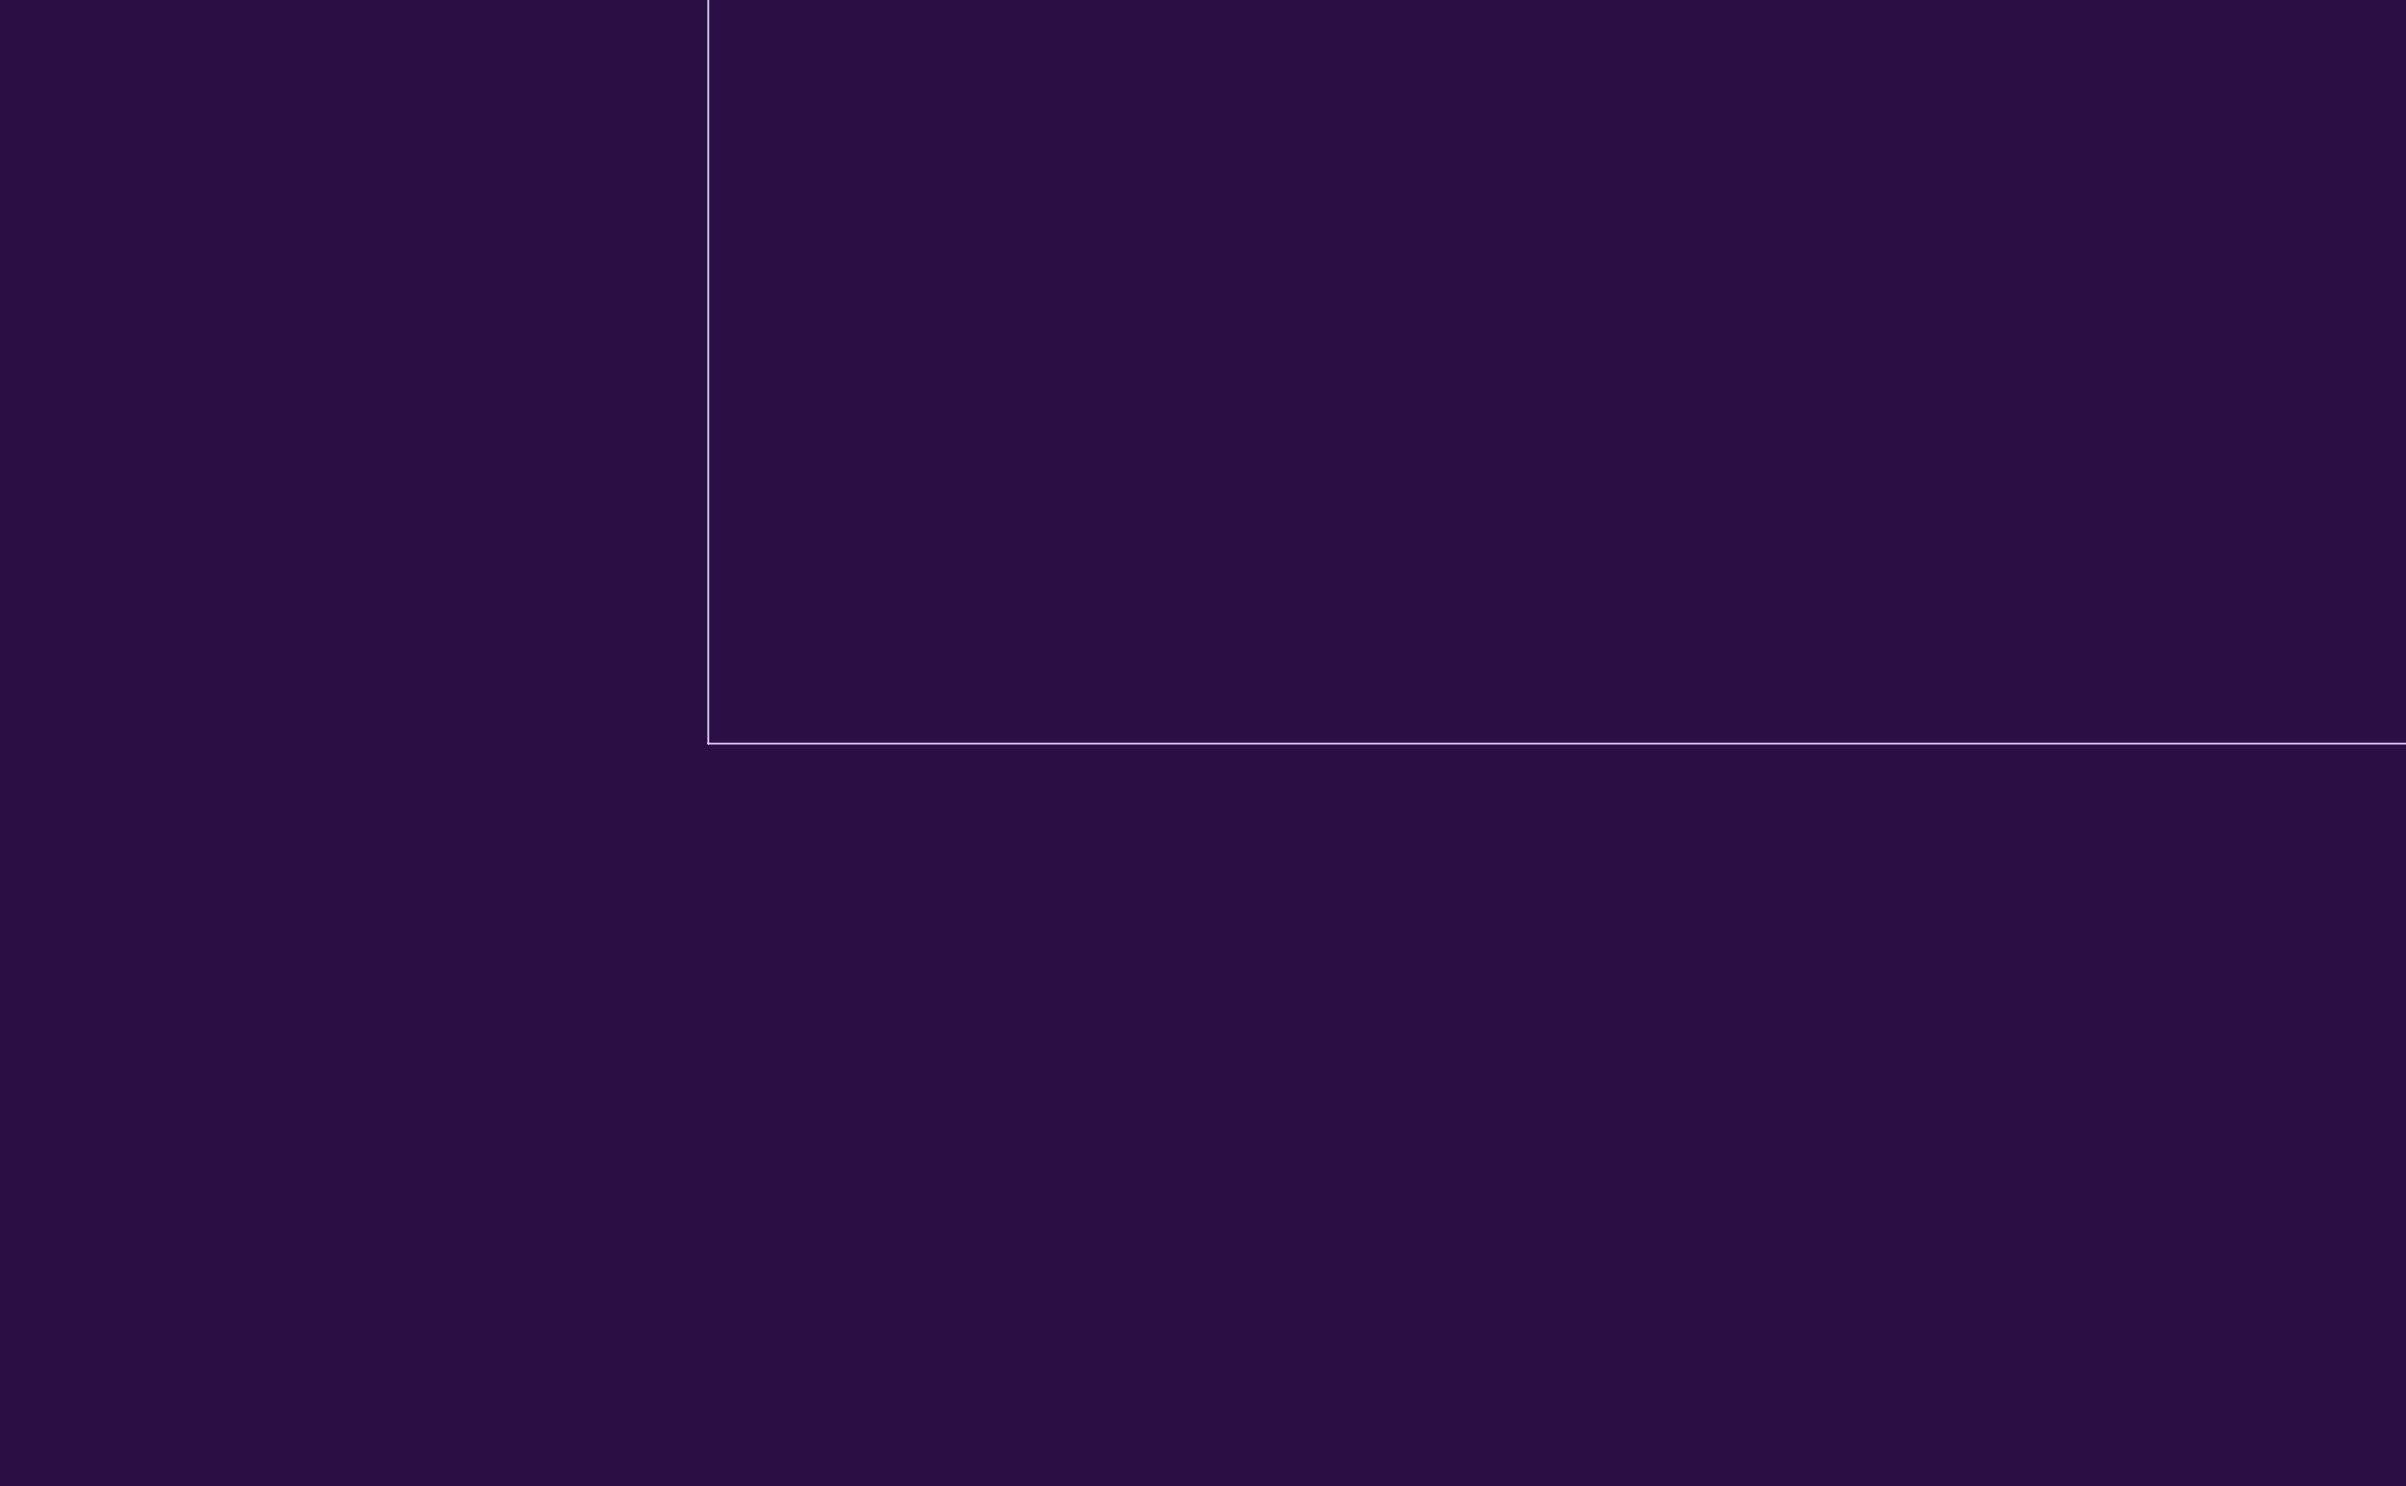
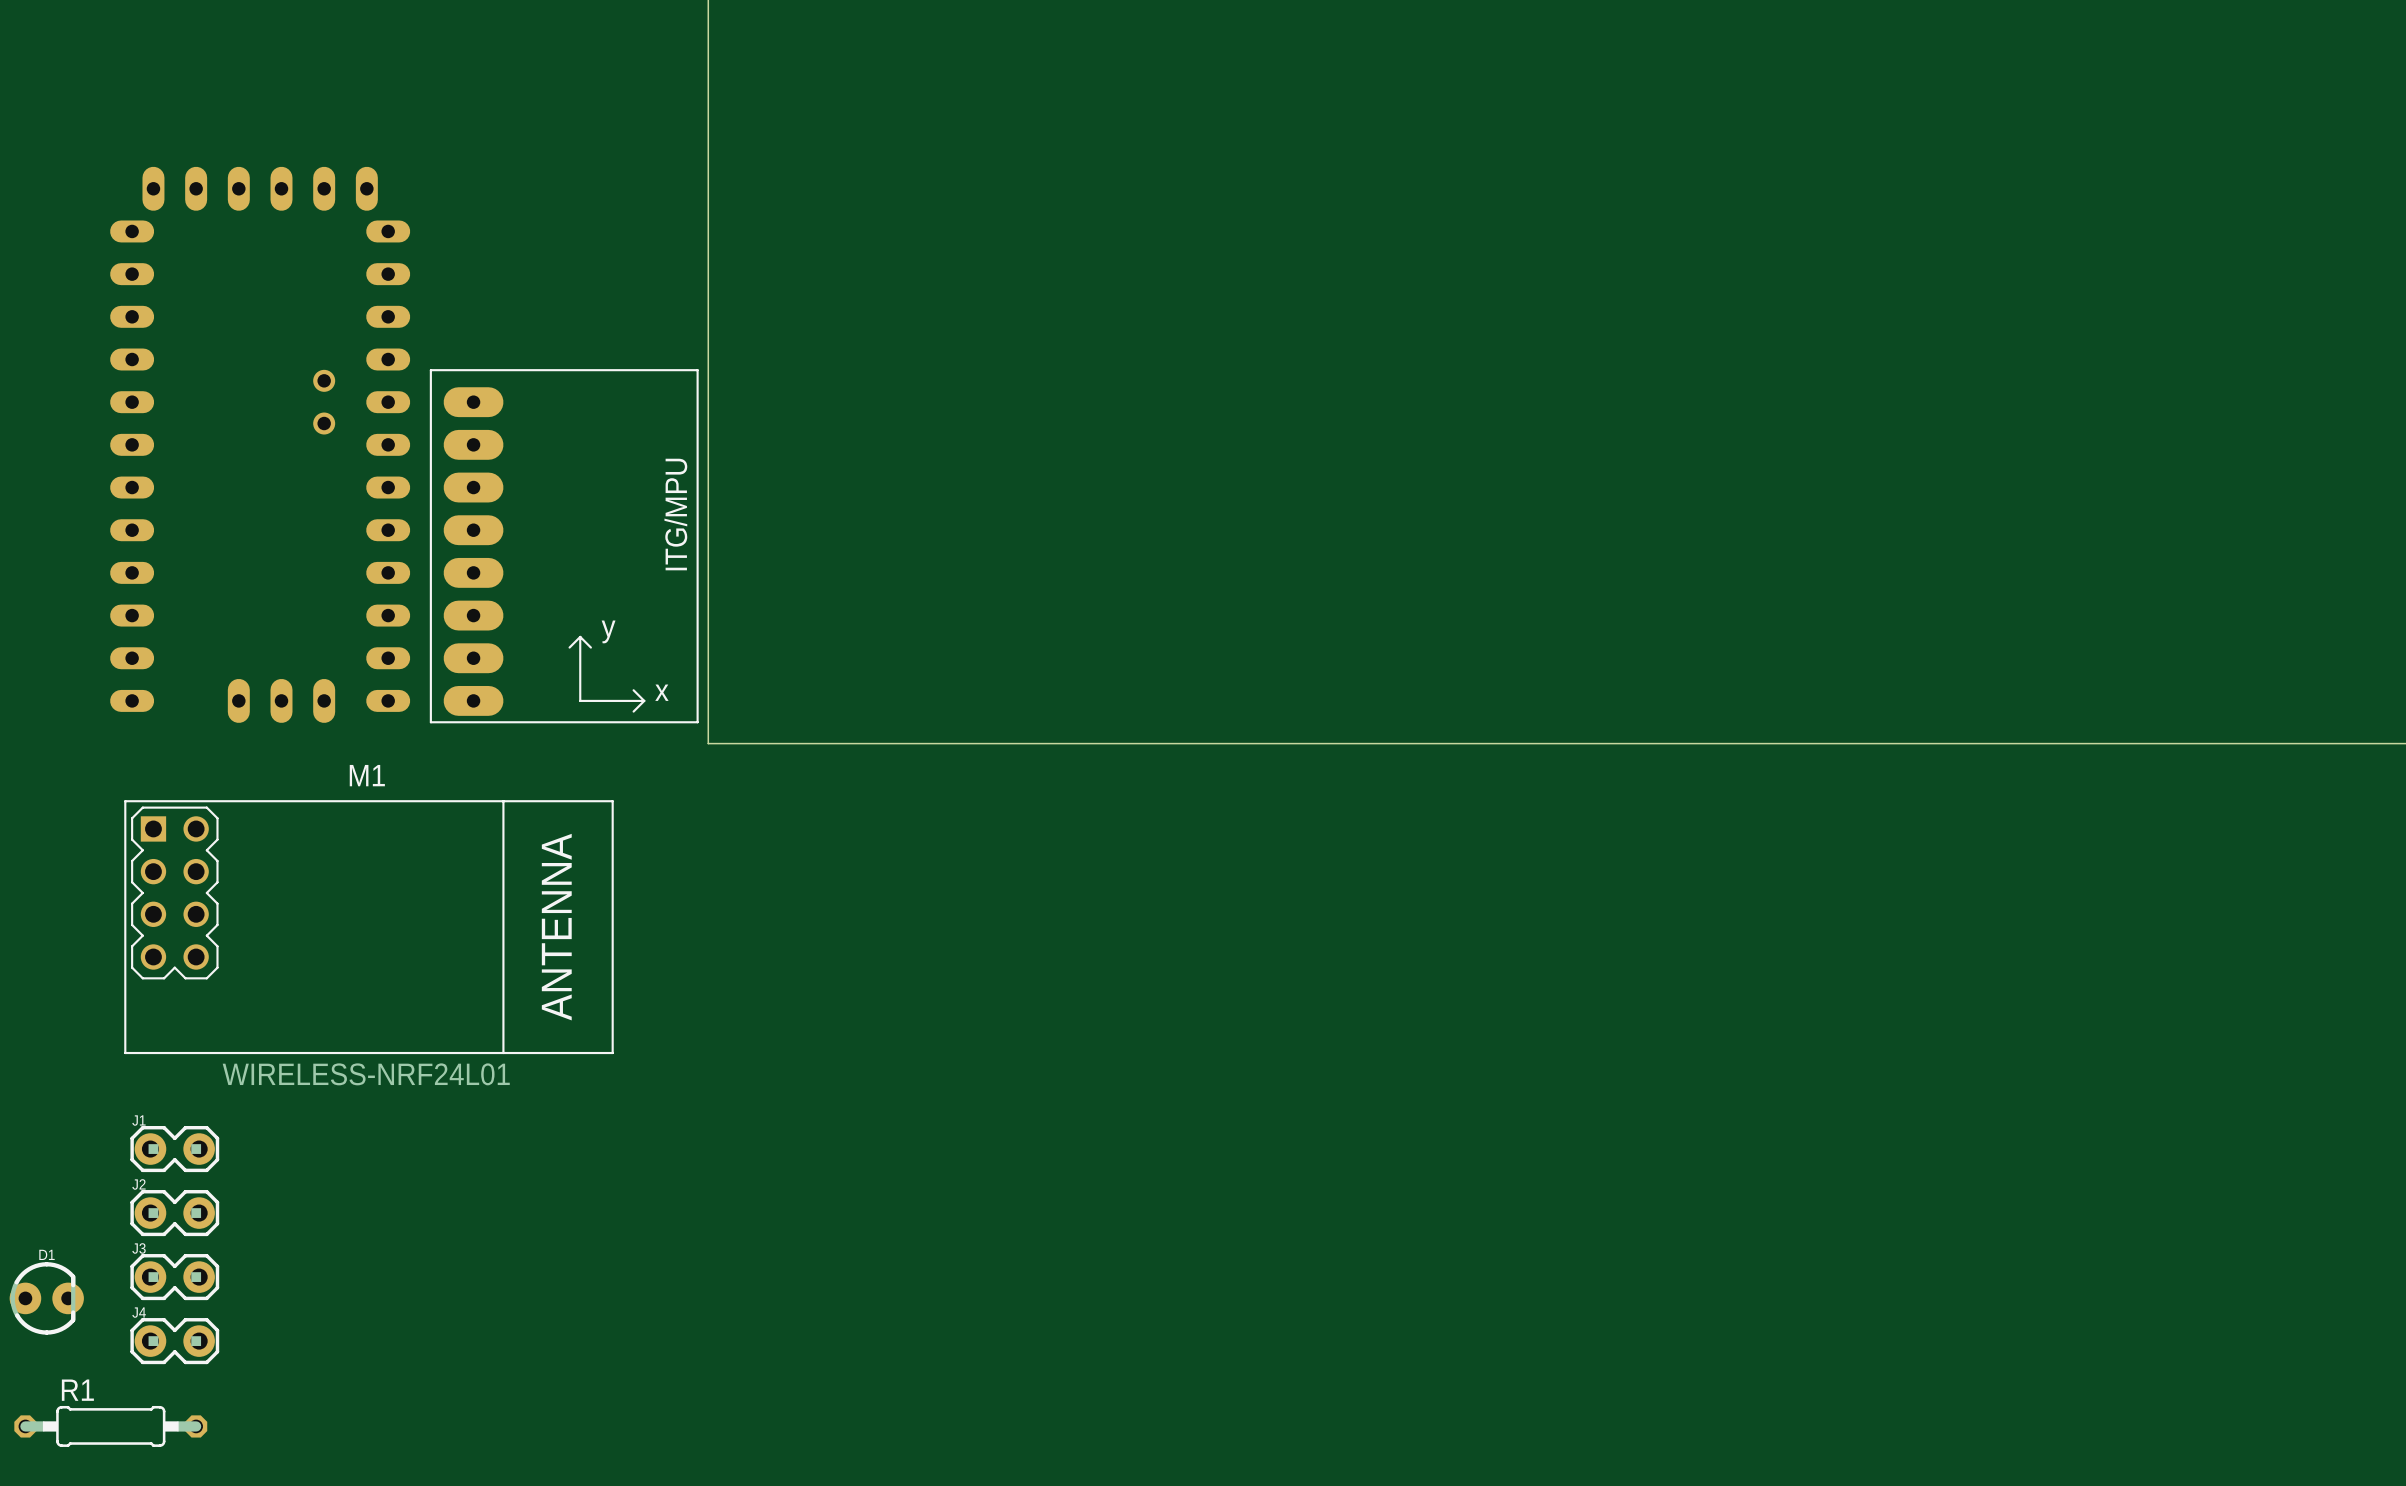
part: none -> (260, 444)
part: none -> (564, 546)
M1: none -> WIRELESS-NRF24L01 (368, 927)
J1: none -> (174, 1149)
J2: none -> (174, 1213)
J3: none -> (174, 1277)
D1: none -> (46, 1298)
J4: none -> (174, 1341)
R1: none -> (110, 1426)

